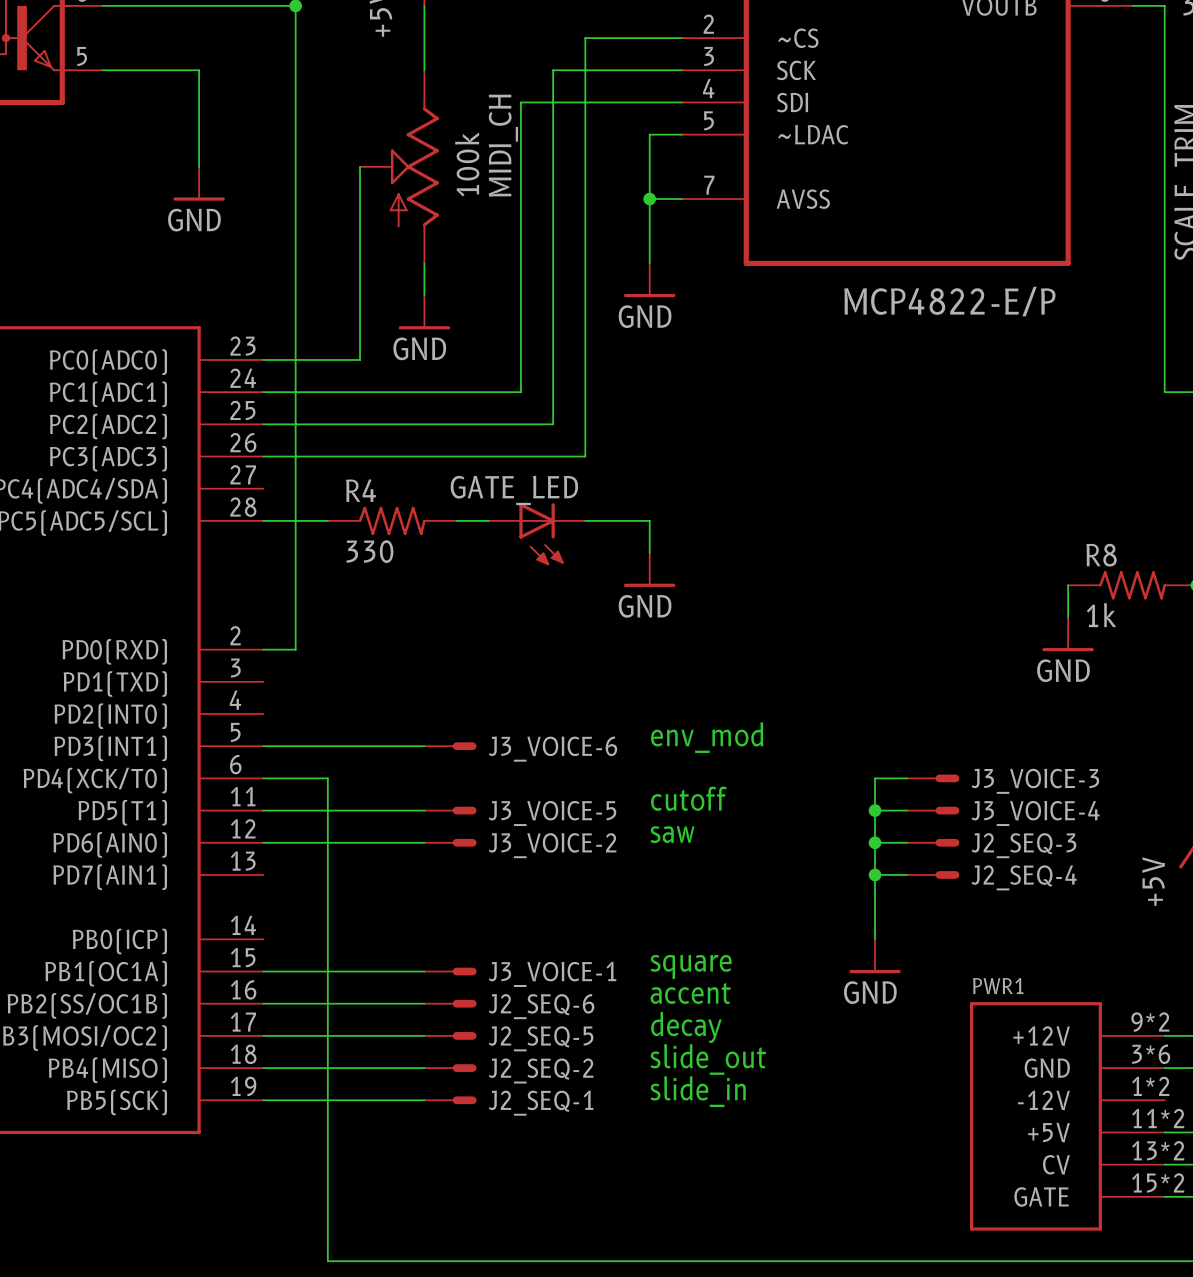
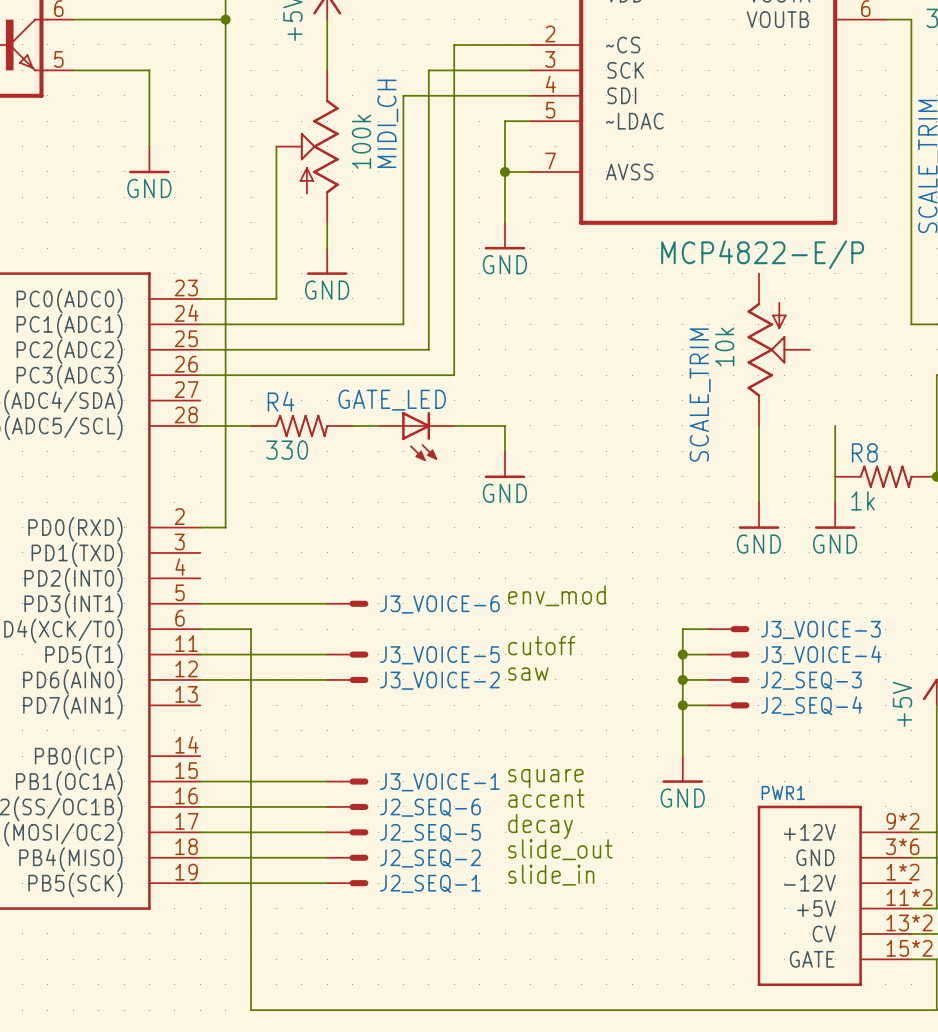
SCALE_TRIM: none -> 10k (778, 349)
wire: none -> (758, 425) (758, 502)
wire: none -> (835, 425) (835, 476)
power symbol: none -> GND (758, 515)

